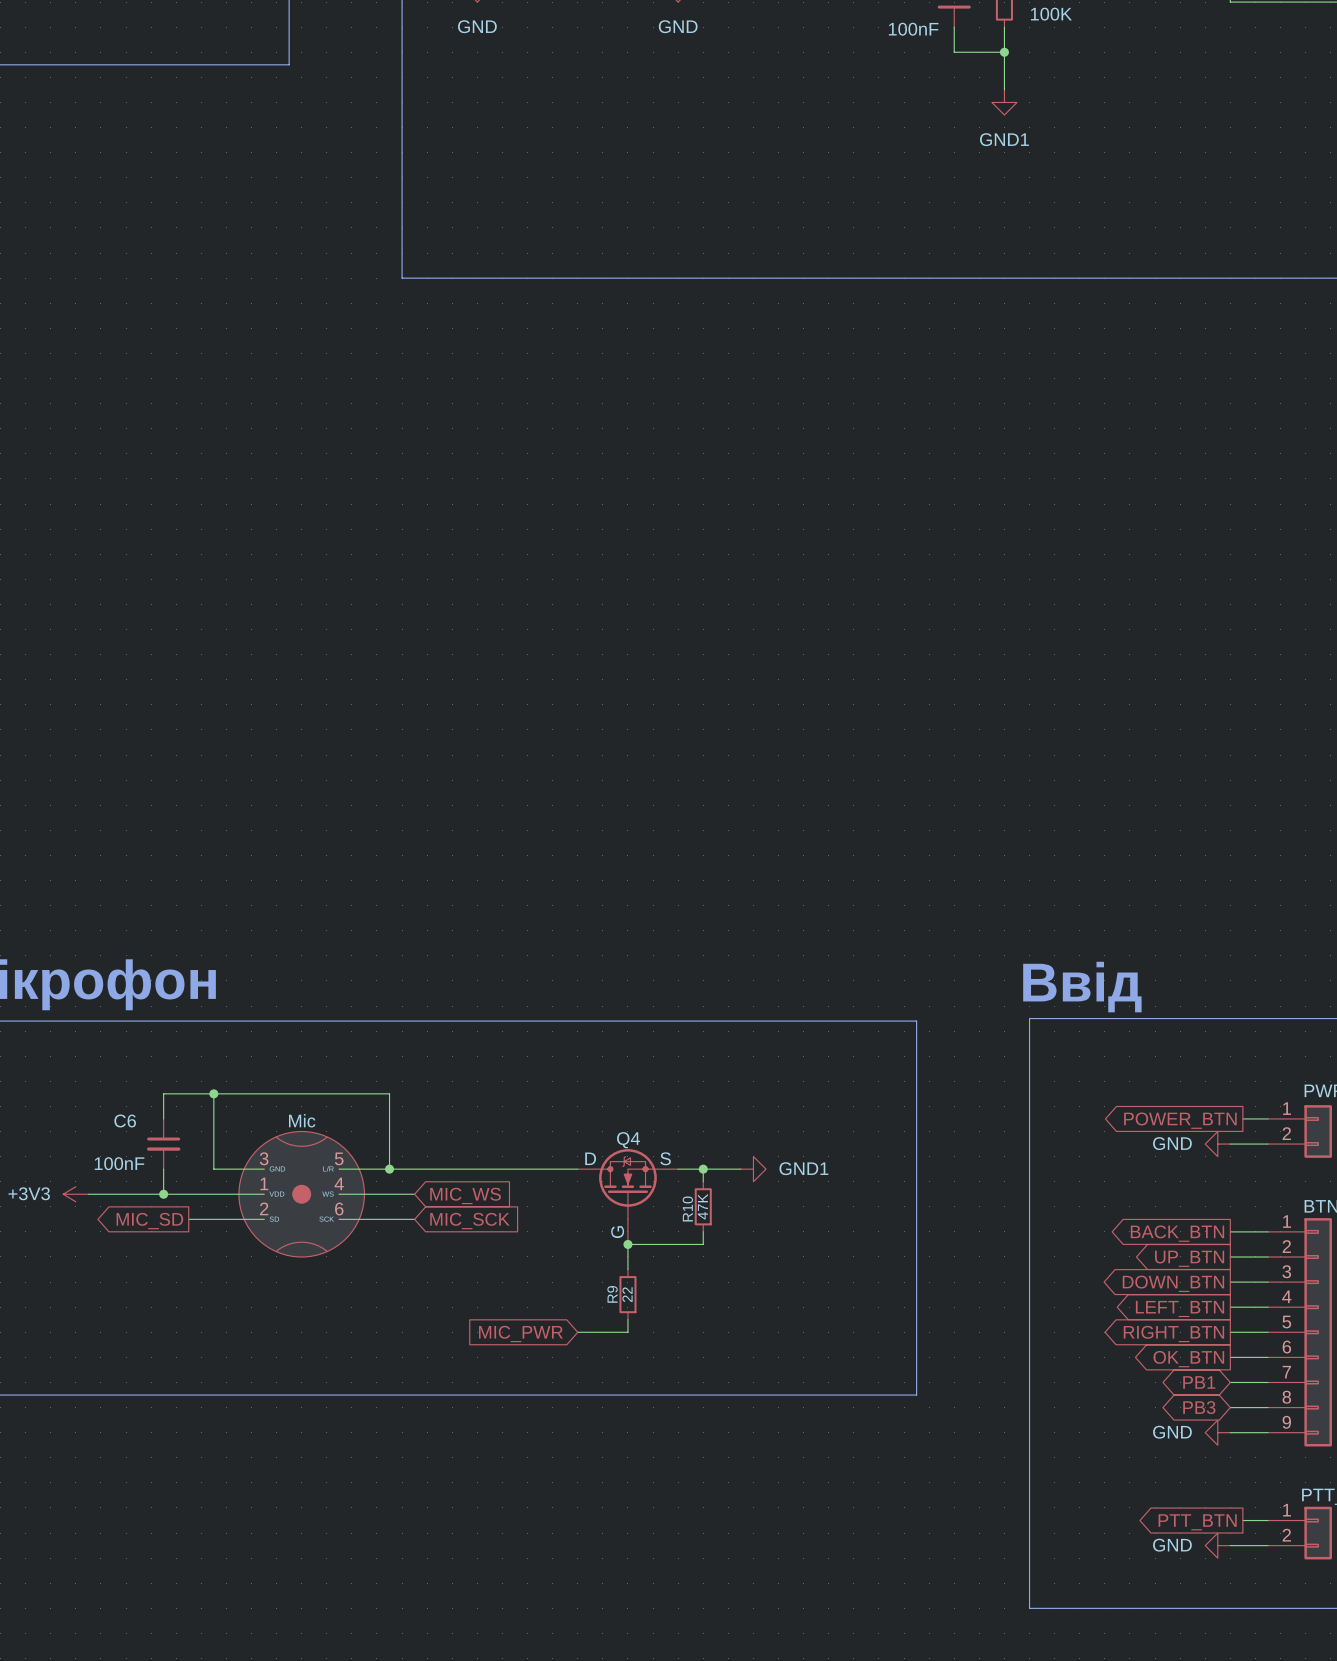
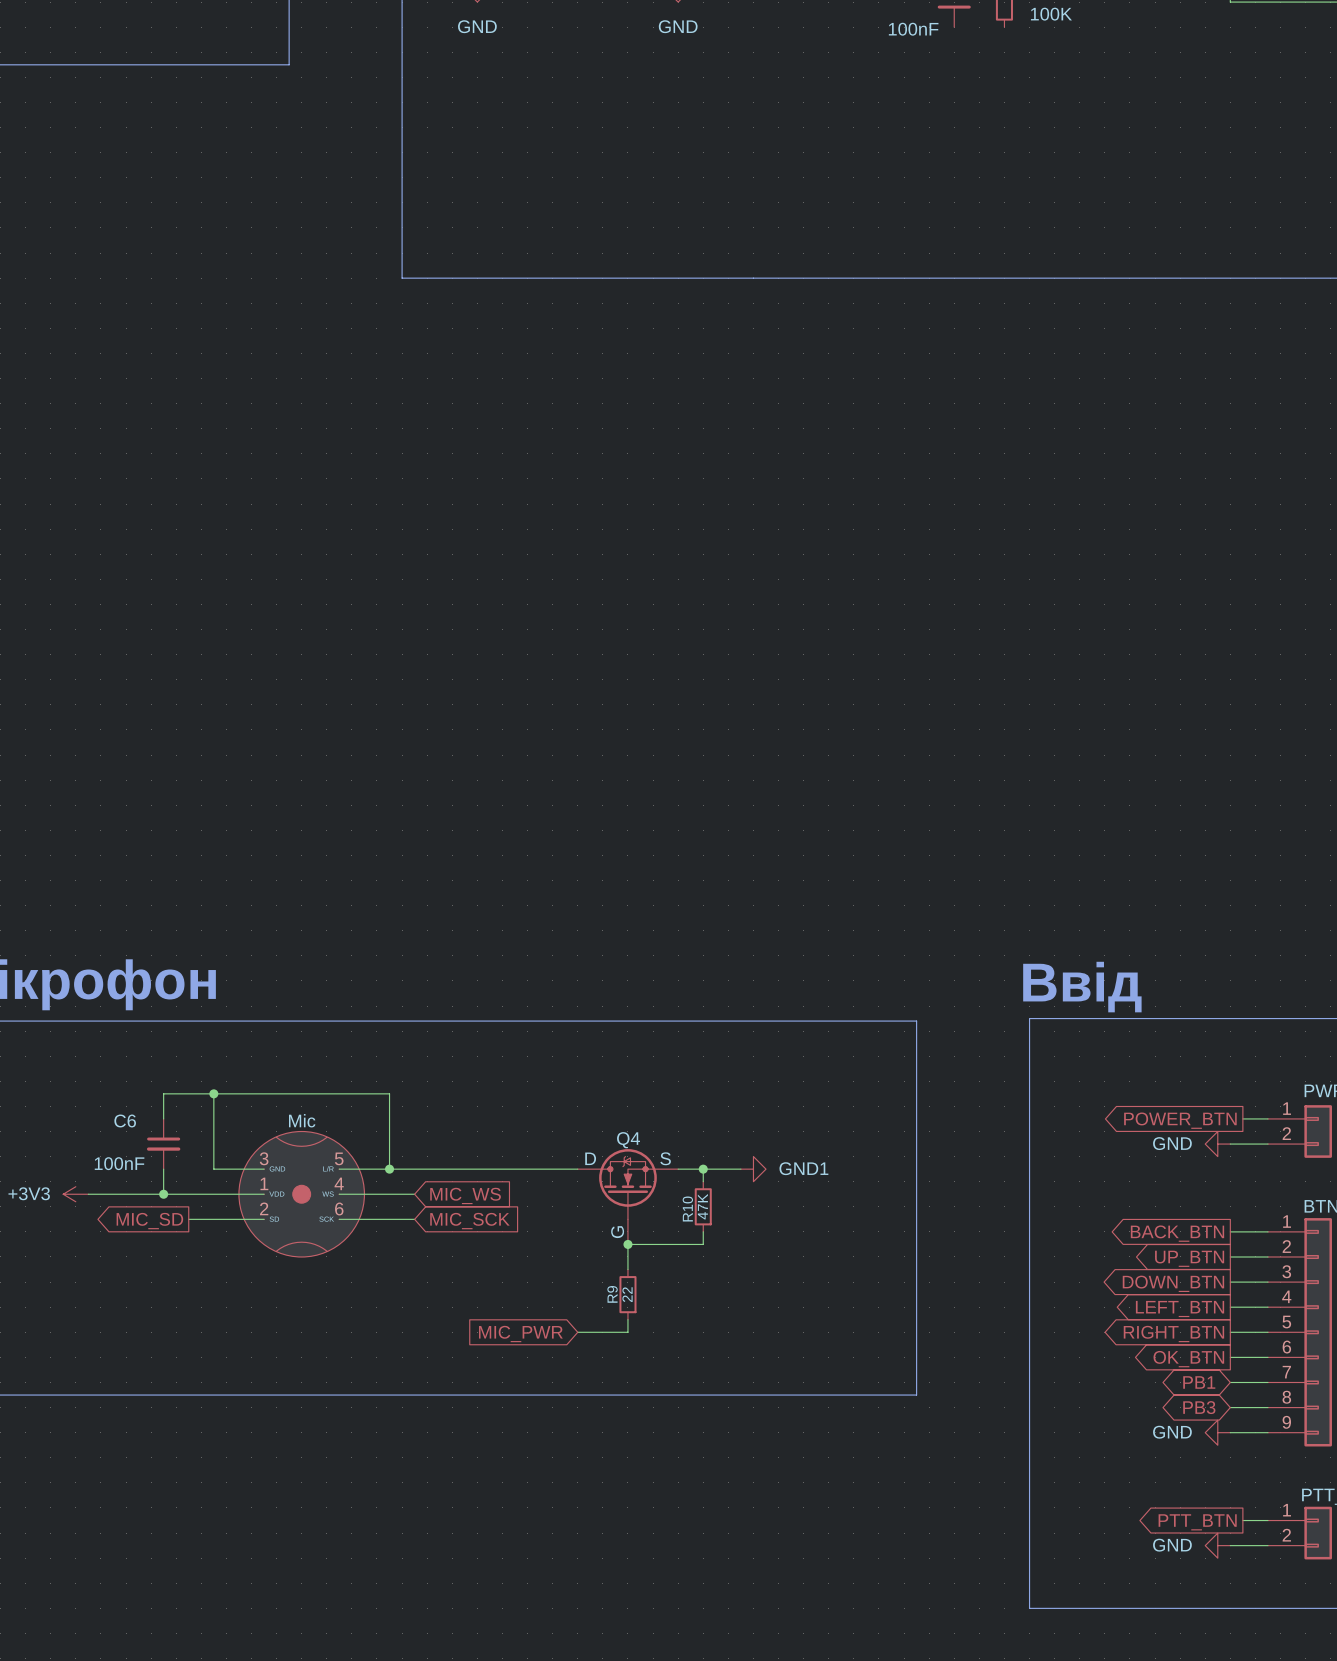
wire: (954, 27) (954, 52) (1004, 52) -> none
wire: (1004, 27) (1004, 89) -> none
junction: (1004, 52) -> none
power symbol: GND1 (1004, 102) -> none

